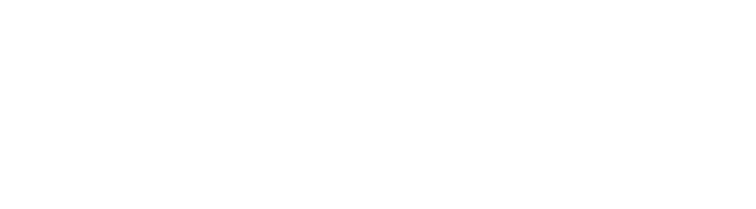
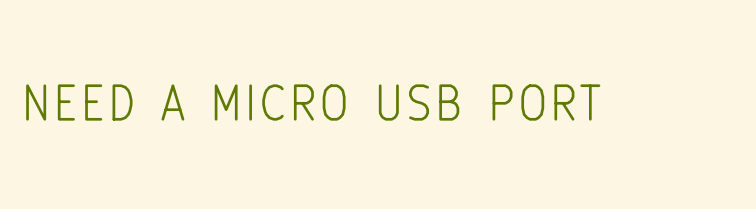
text: none -> NEED A MICRO USB PORT (313, 102)

